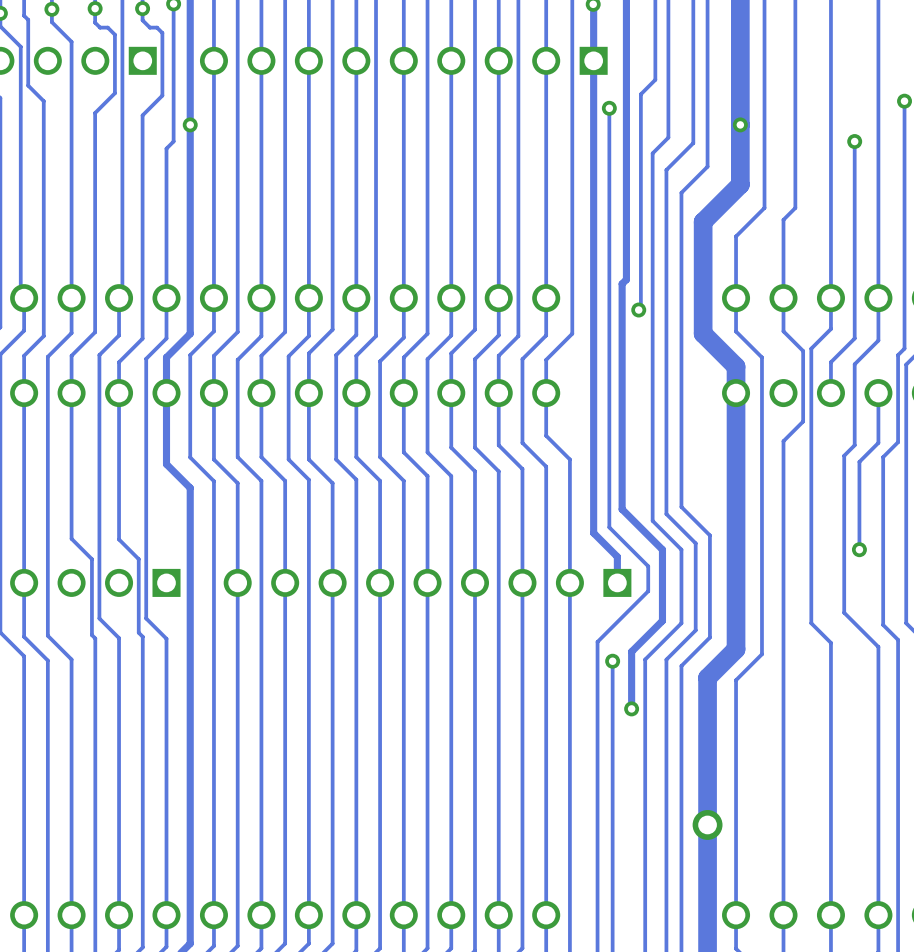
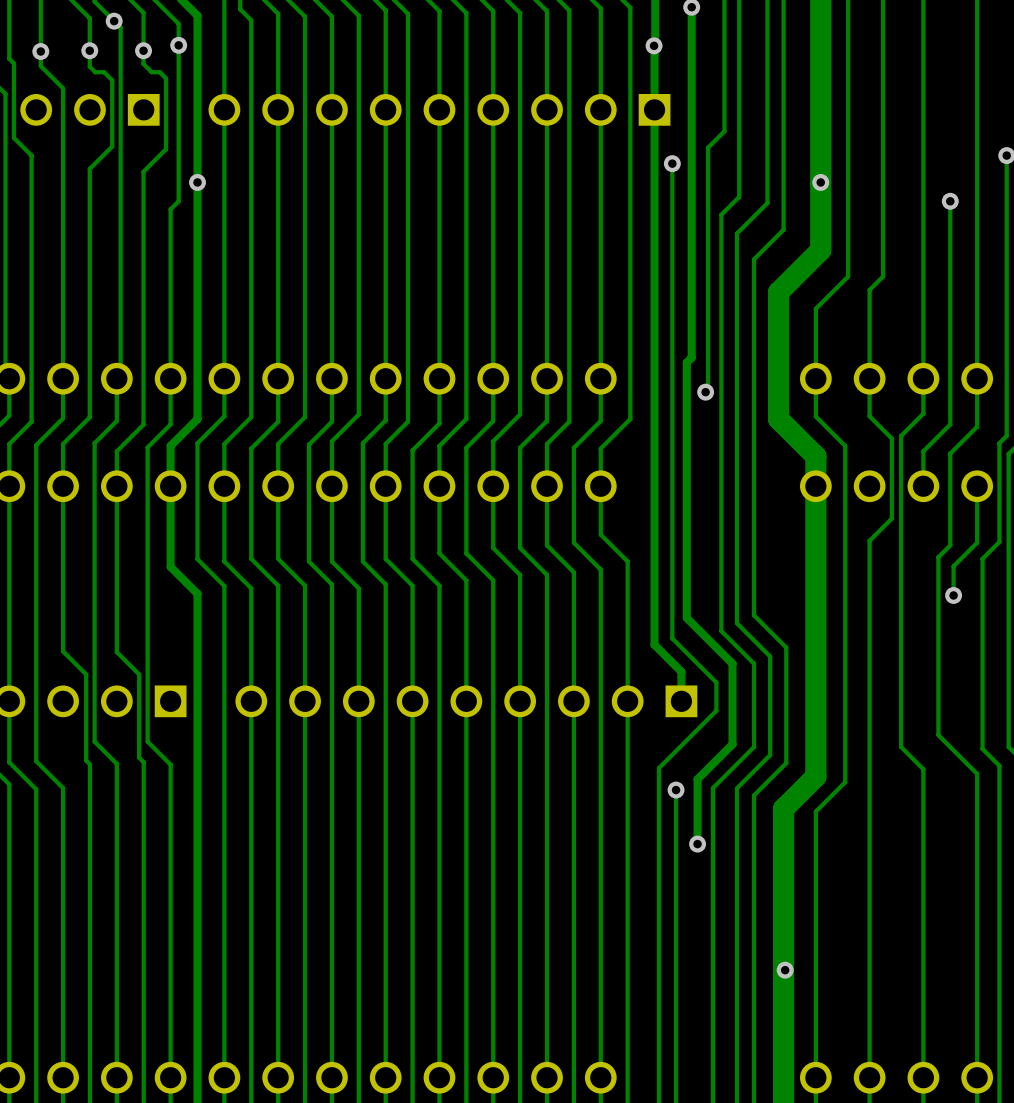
track: (859, 461) (859, 549) -> (955, 564) (953, 566) (953, 595)
via position: (859, 549) -> (953, 595)
via size: [692, 810, 723, 840] -> [776, 961, 794, 979]

